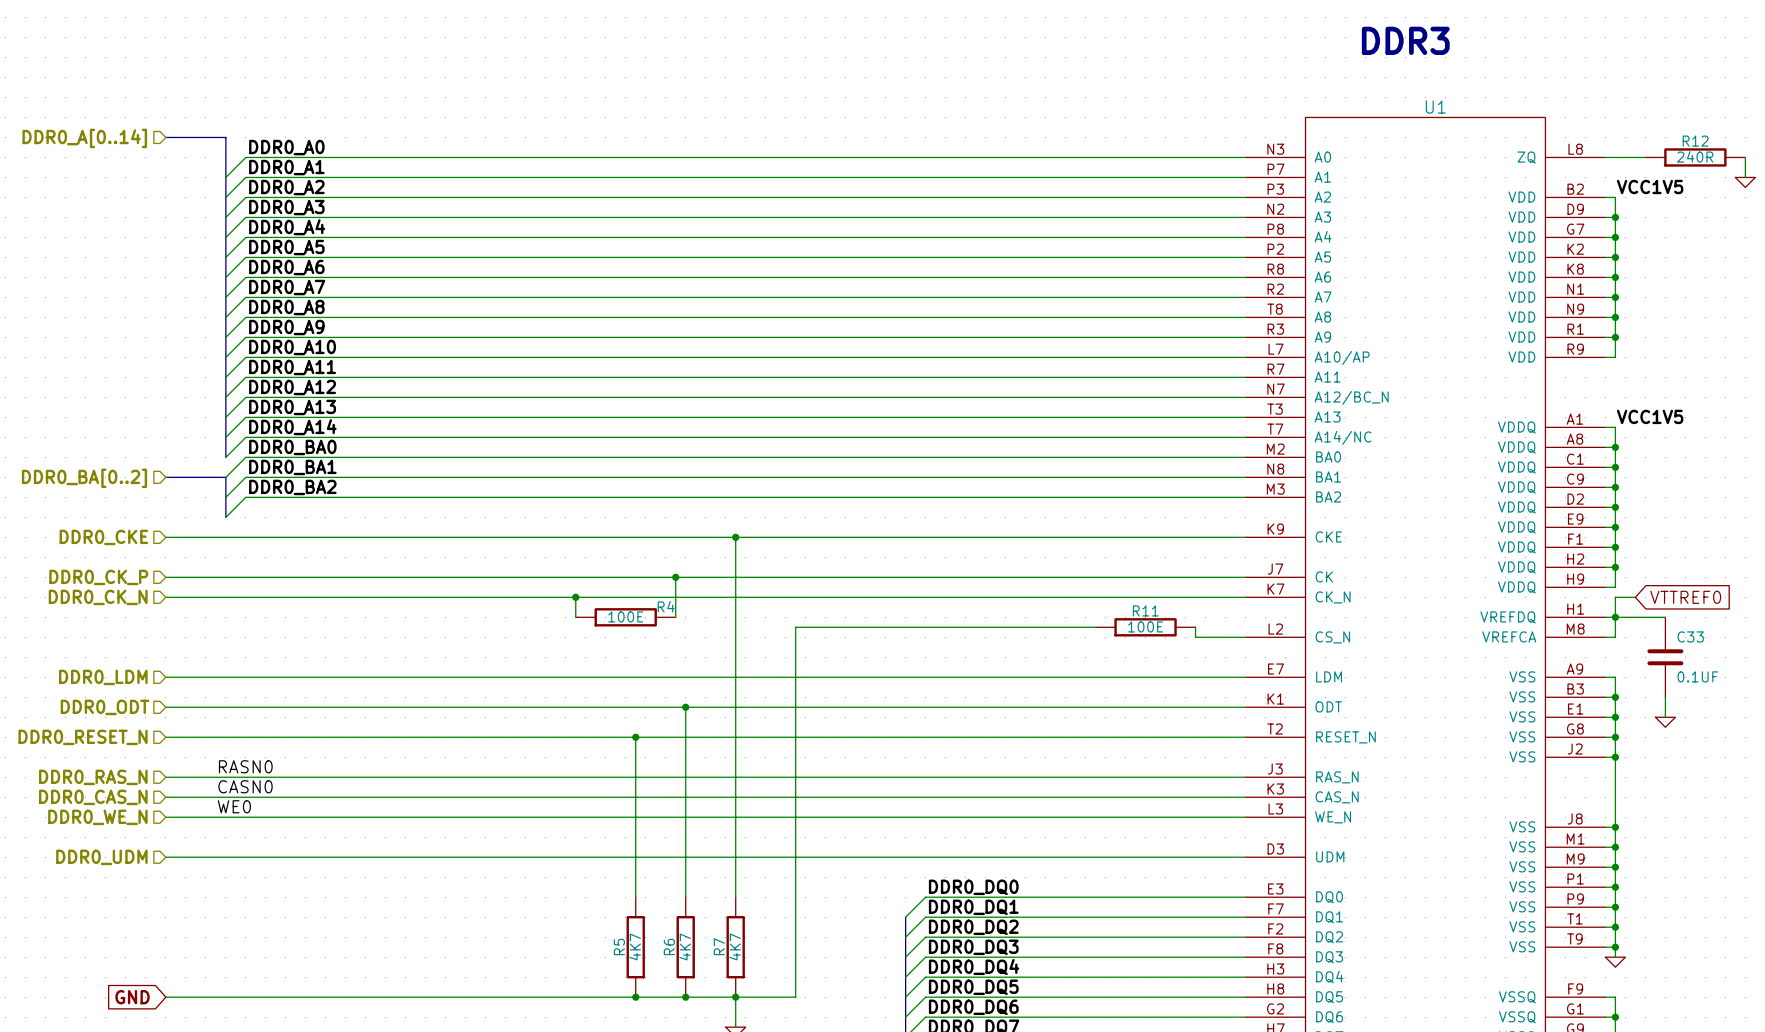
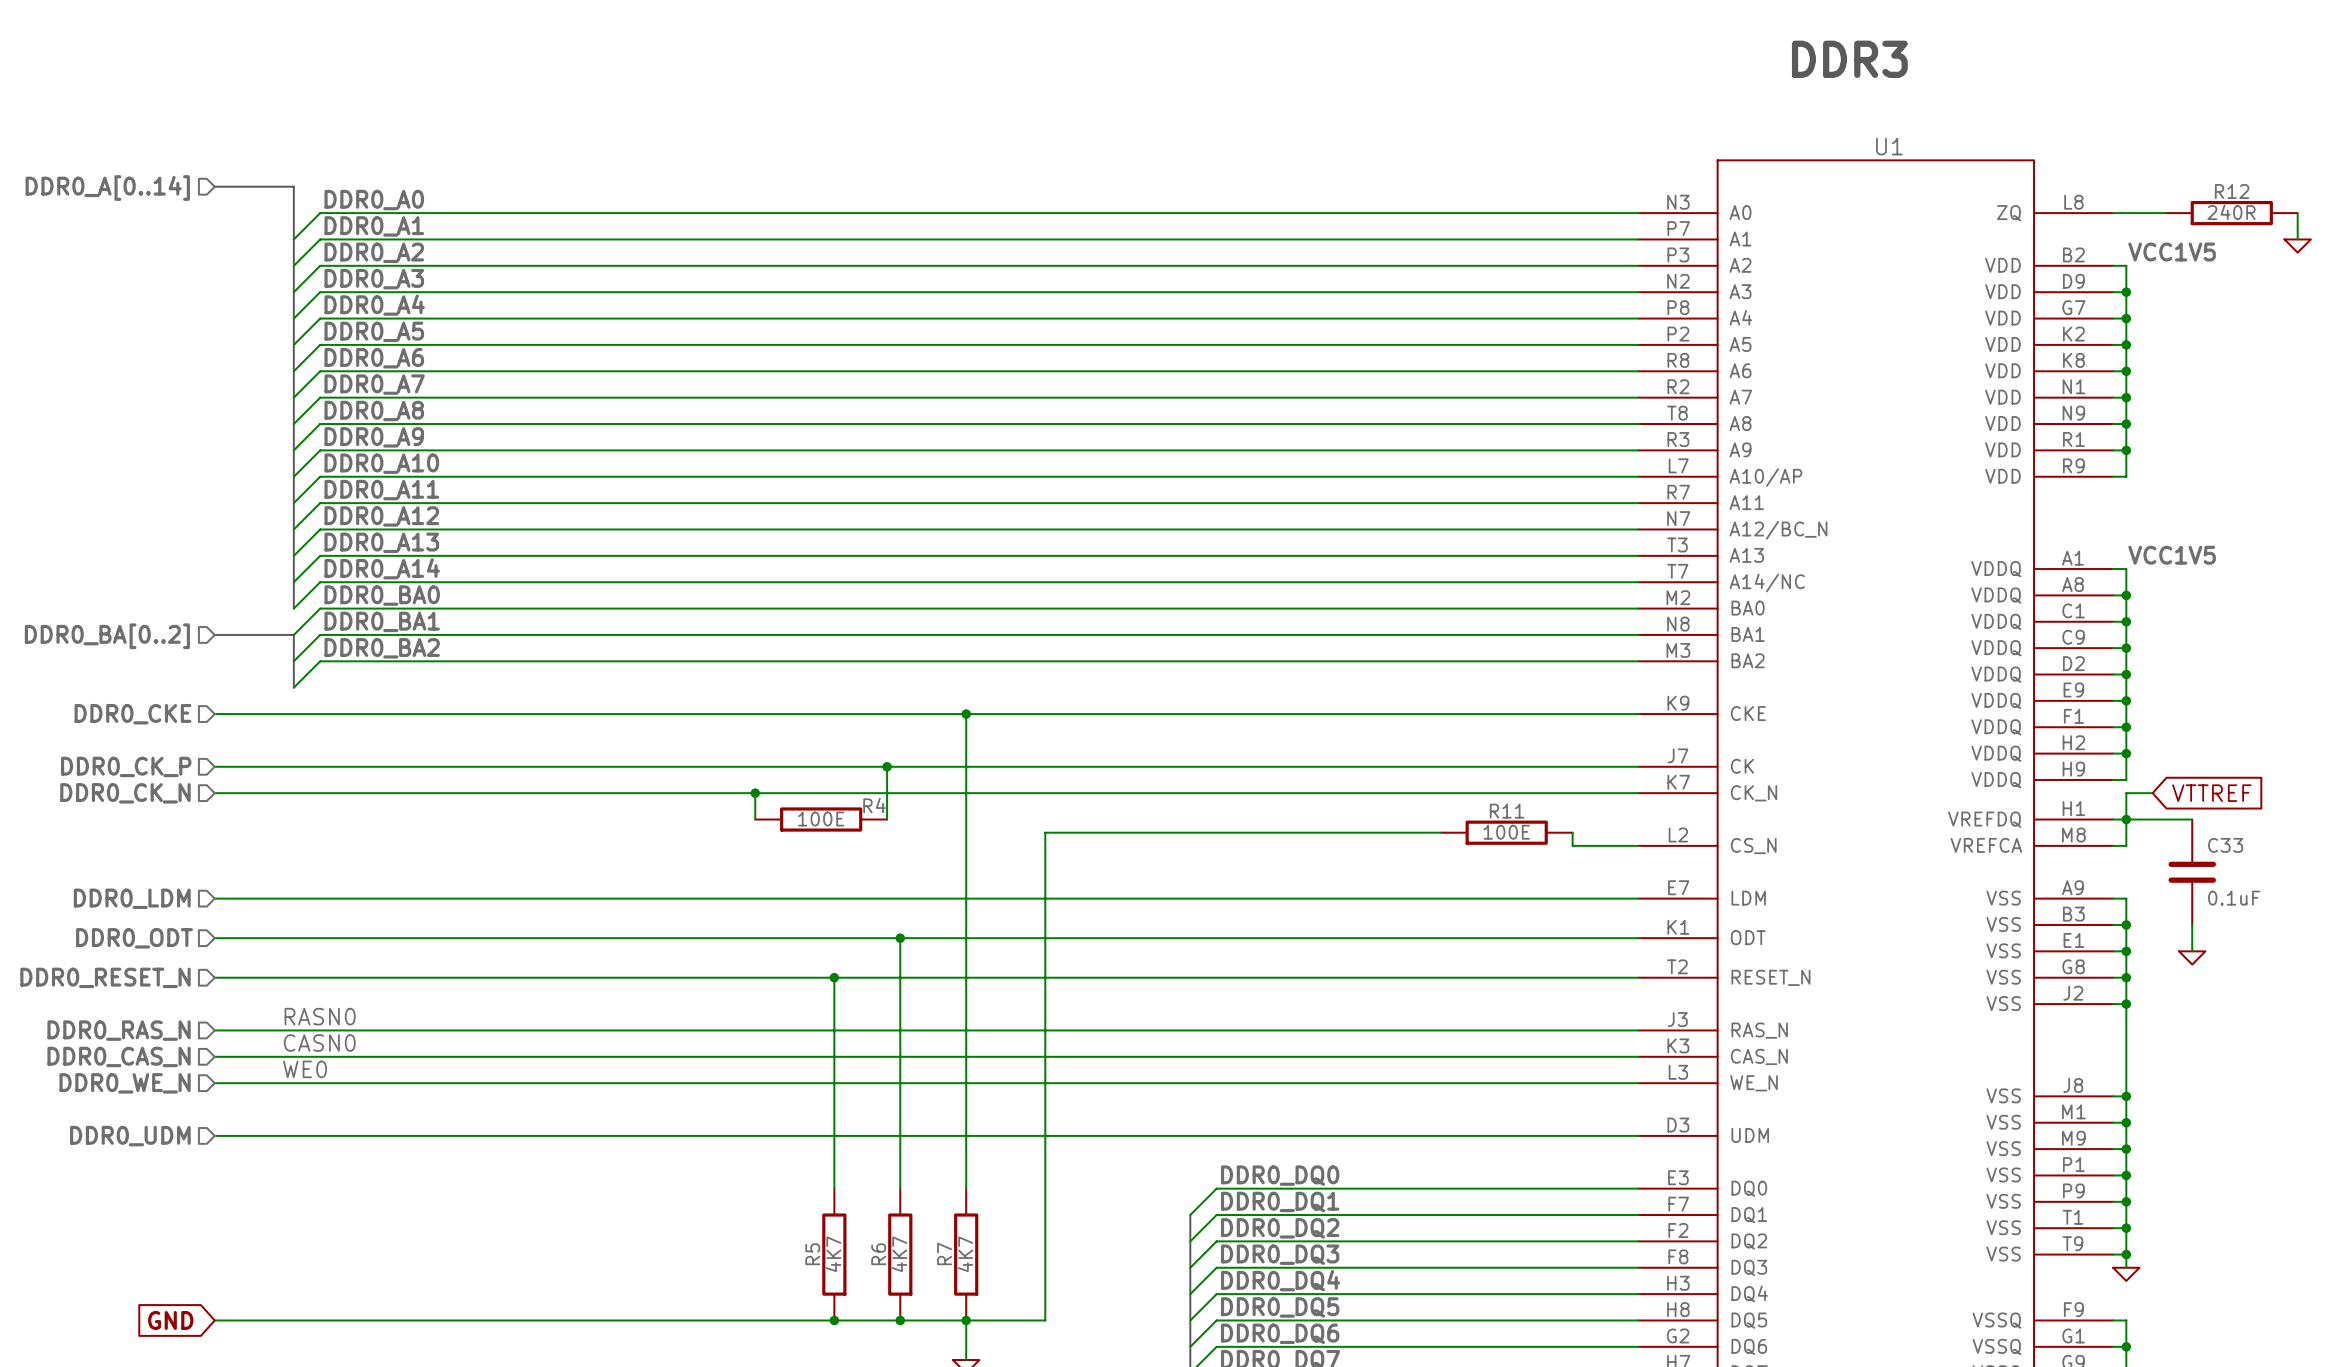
global label: VTTREF0 (1685, 597) -> VTTREF (2211, 793)
C33 value: 0.1UF (1697, 676) -> 0.1uF (2234, 898)

